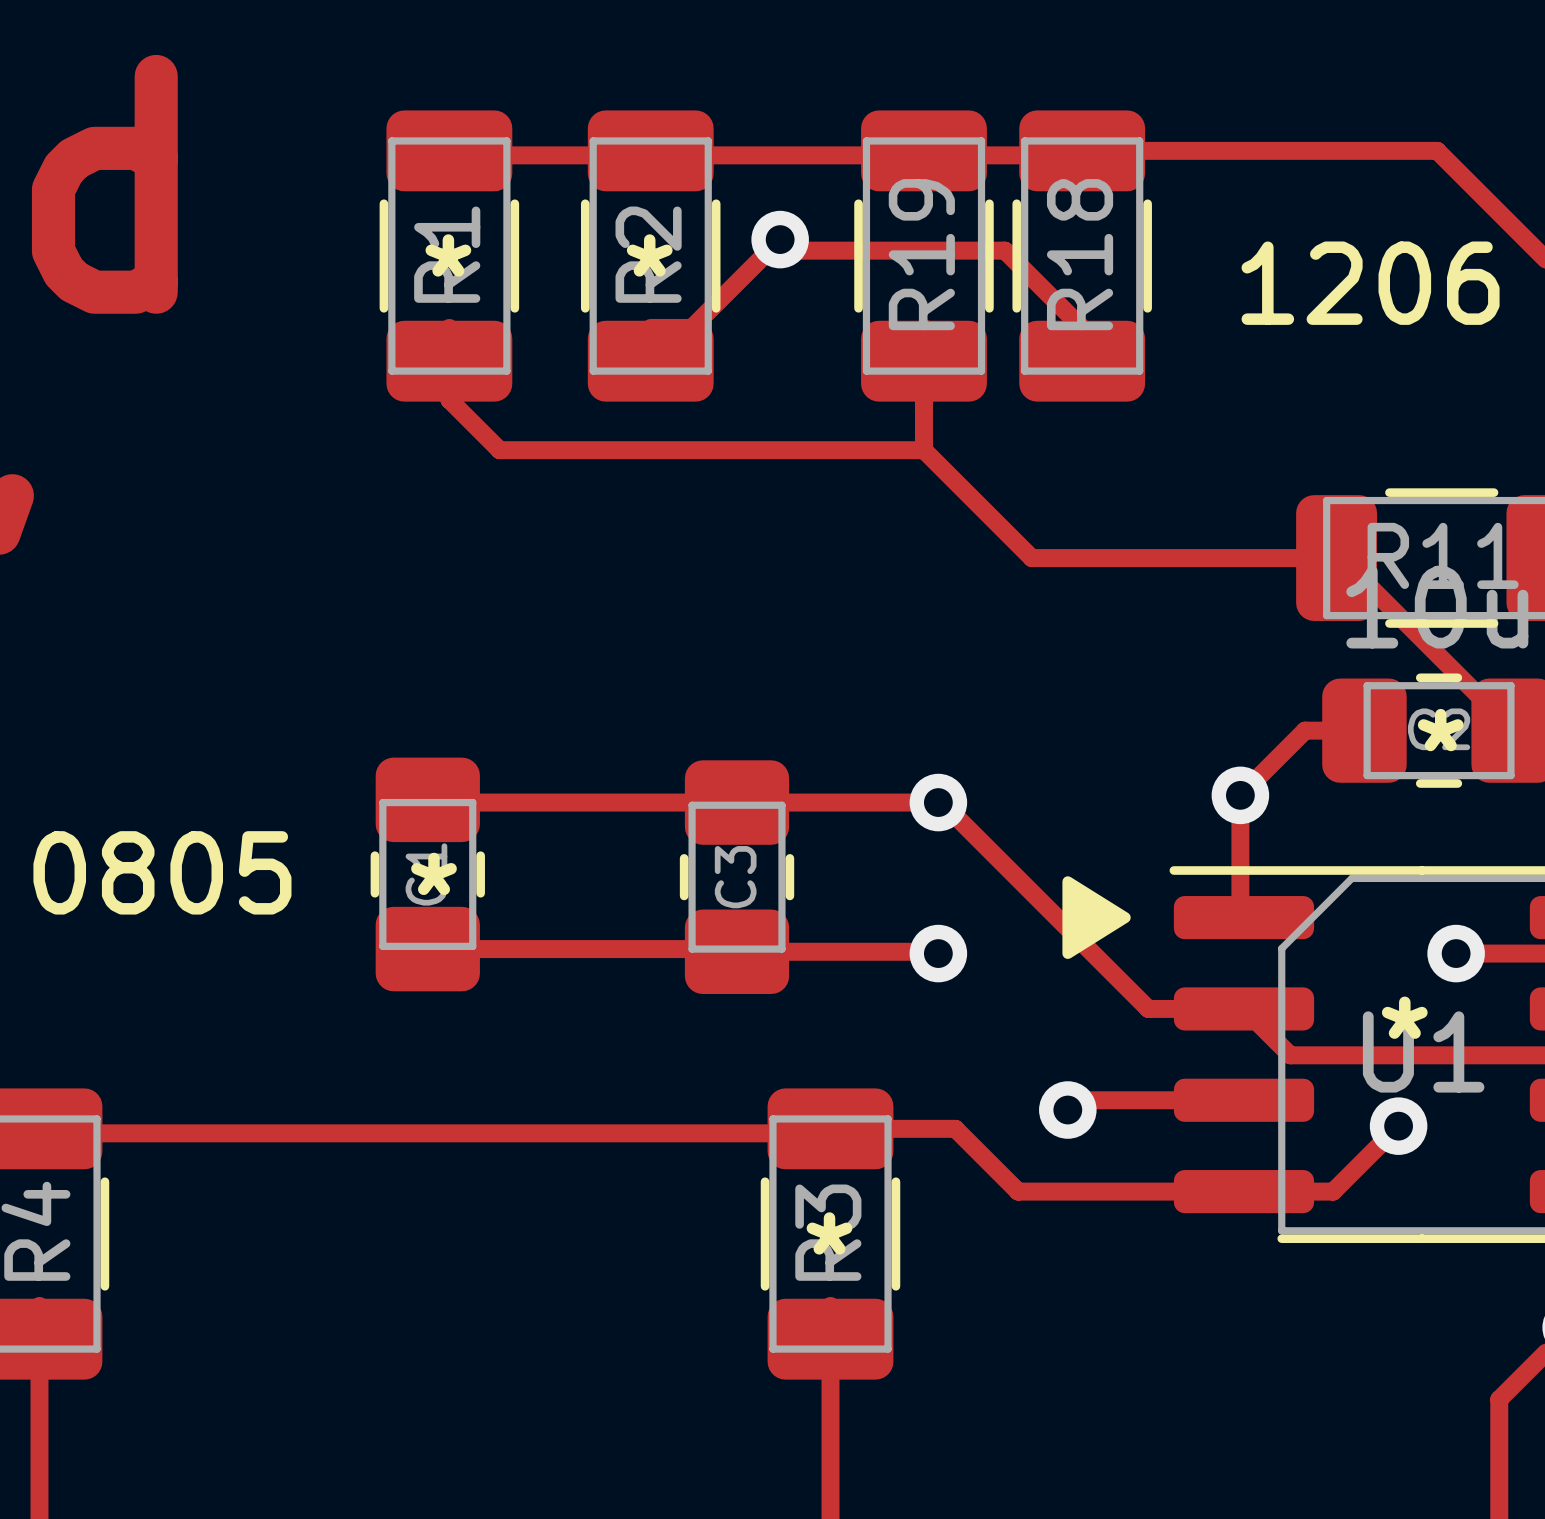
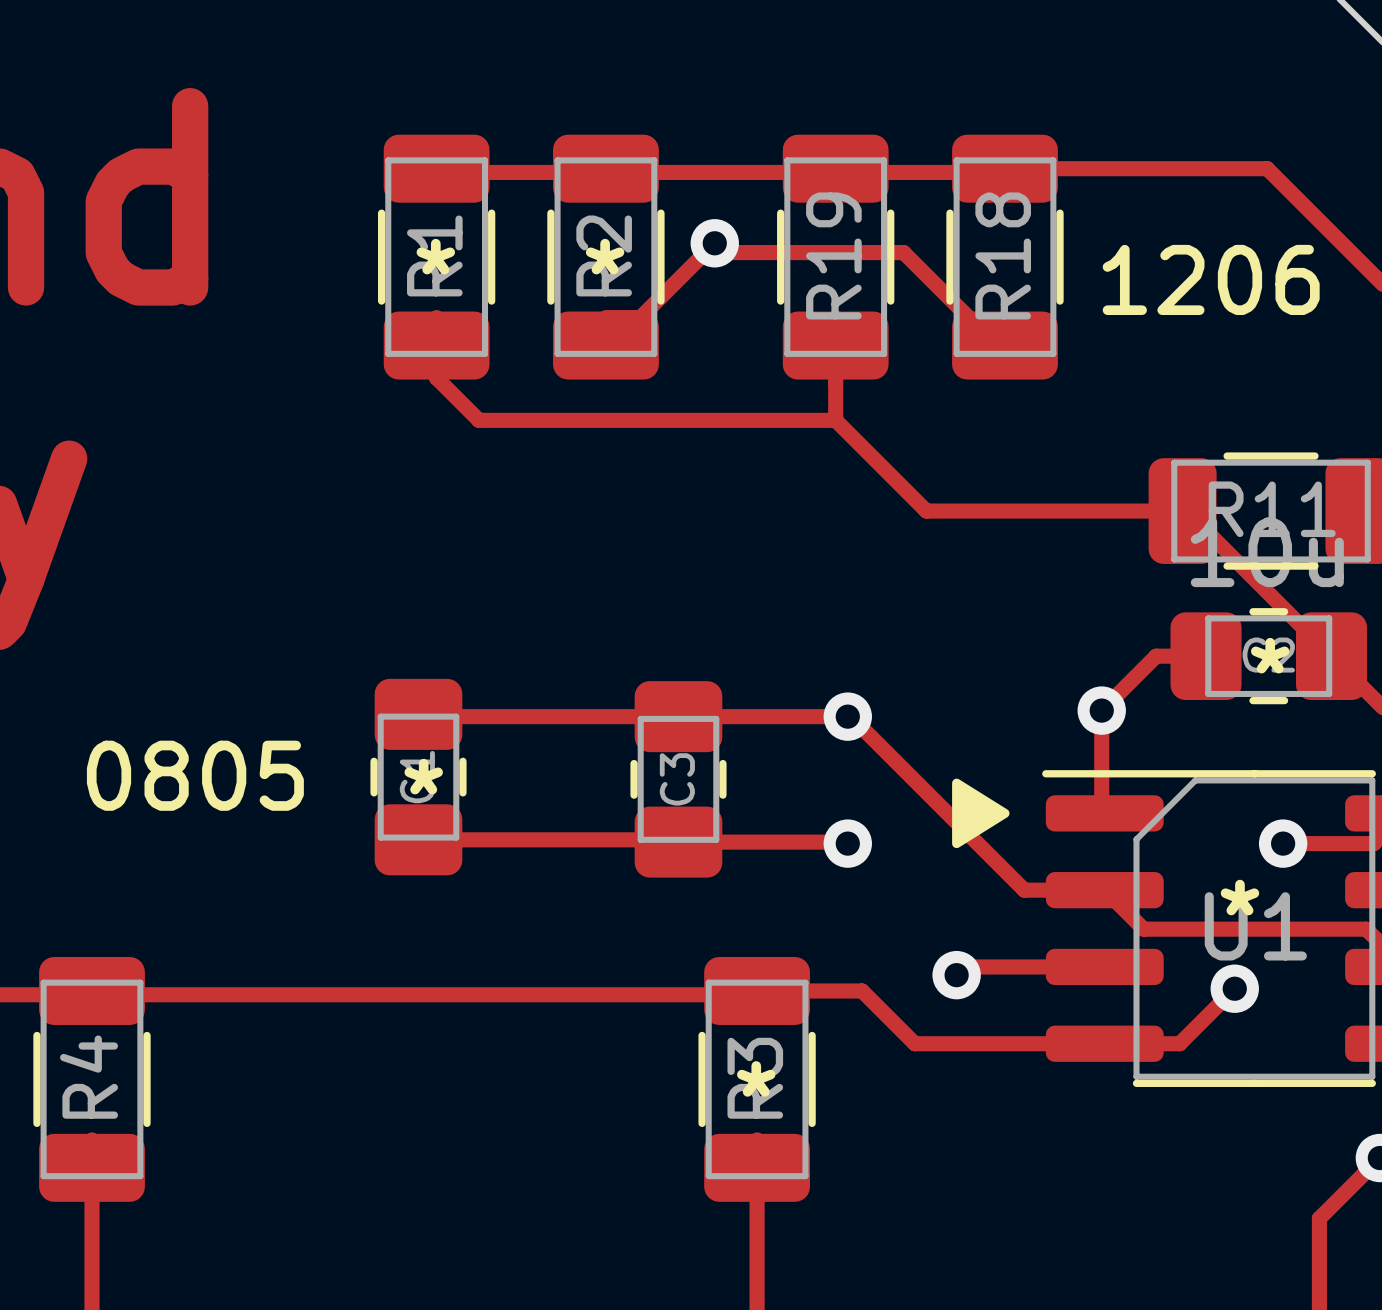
R18 position: (1082, 256) -> (1004, 257)

